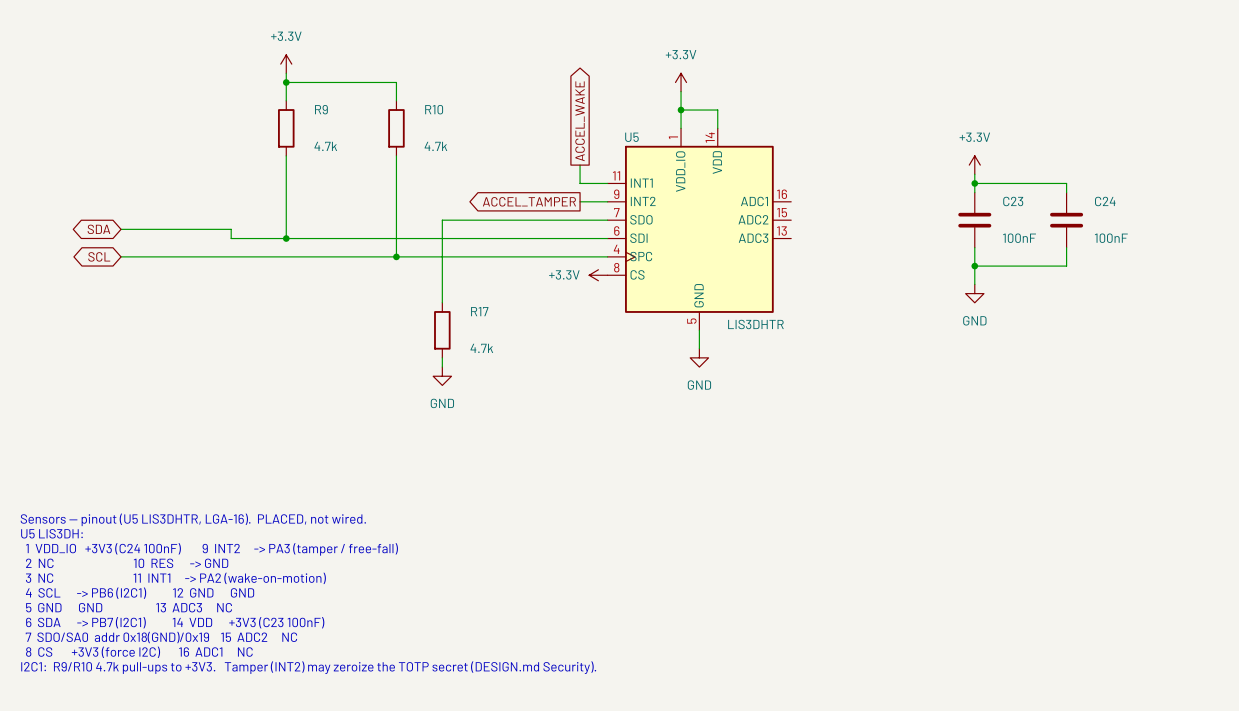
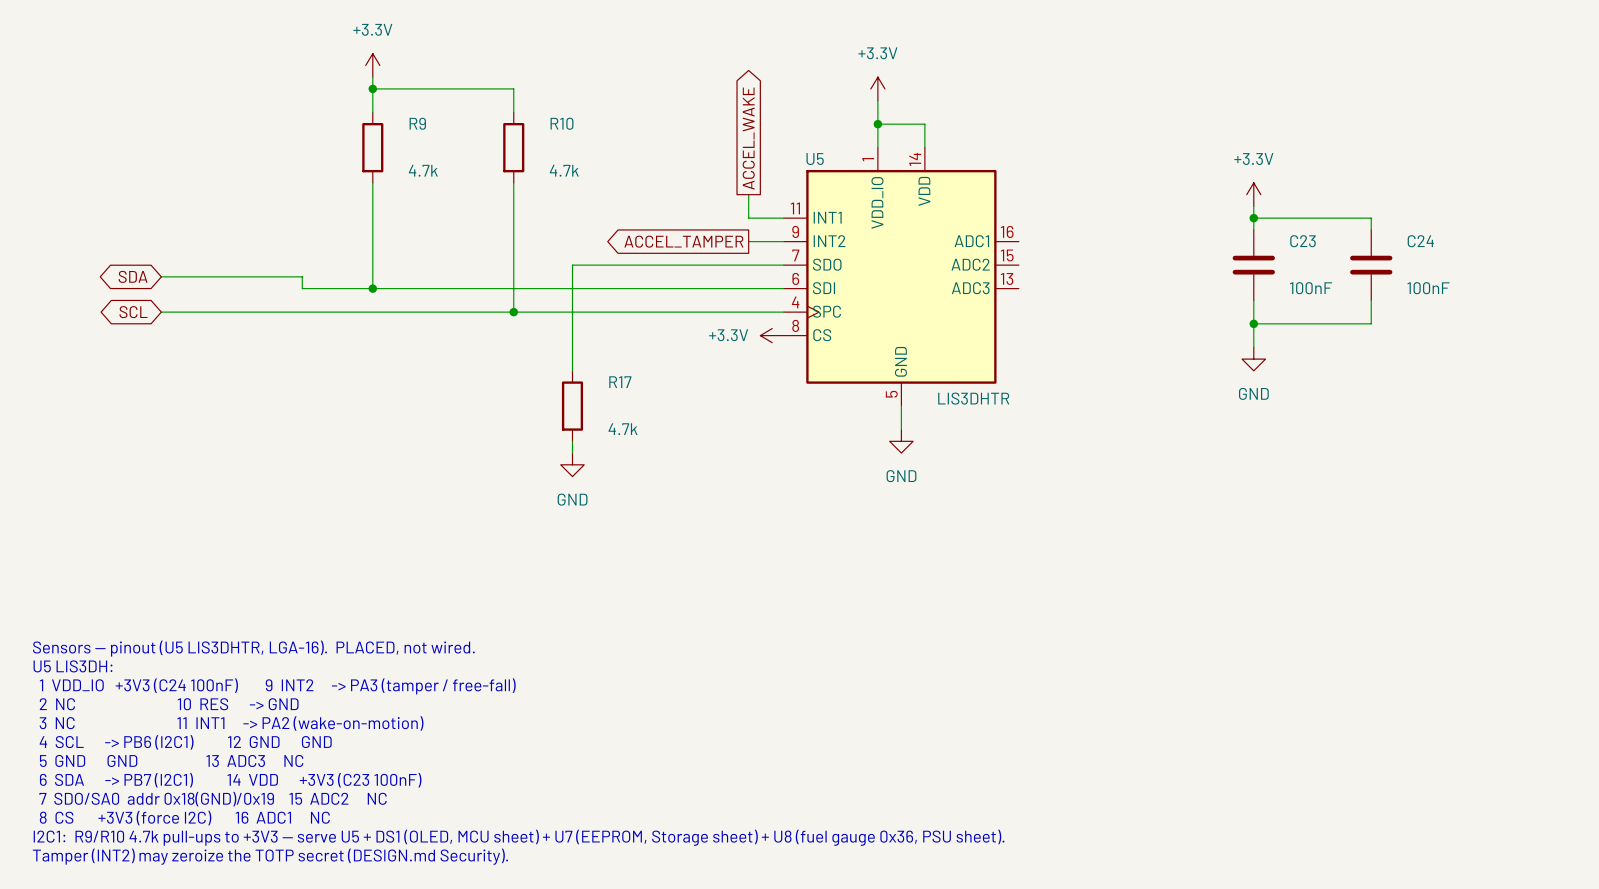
text: I2C1: R9/R10 4.7k pull-ups to +3V3. Tamper (INT2) may zeroize the TOTP secret (DESIGN.md Security). (308, 667) -> I2C1: R9/R10 4.7k pull-ups to +3V3 — serve U5 + DS1 (OLED, MCU sheet) + U7 (EEPROM, Storage sheet) + U8 (fuel gauge 0x36, PSU sheet). (519, 837)
text: none -> Tamper (INT2) may zeroize the TOTP secret (DESIGN.md Security). (270, 856)

